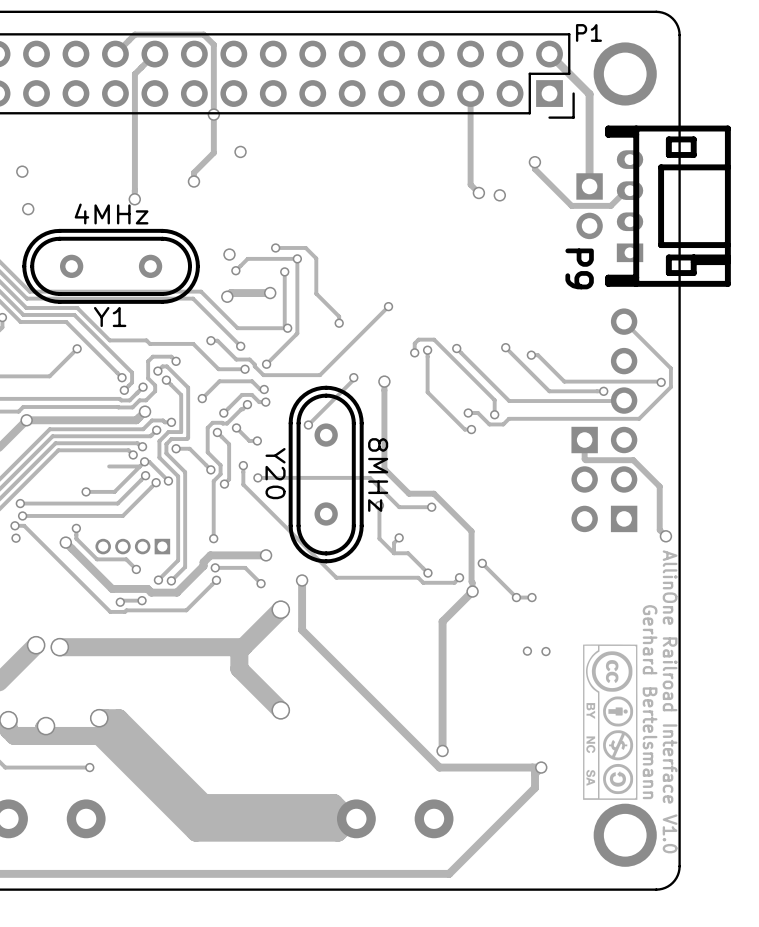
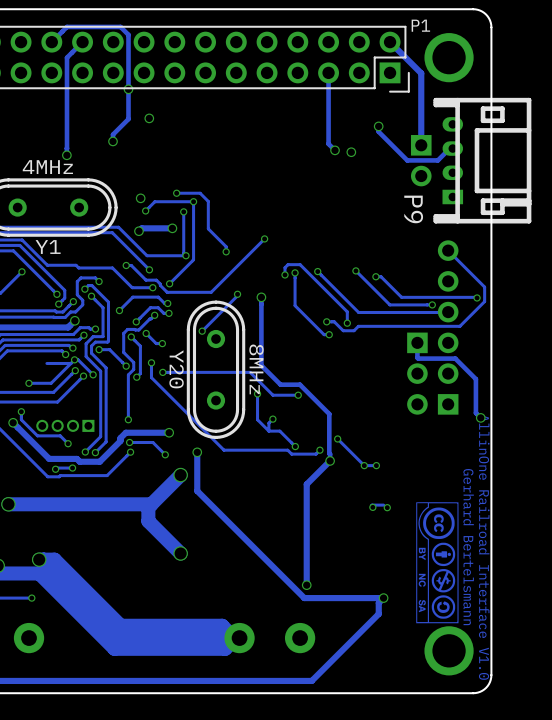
track: none -> (383, 505) (371, 505)

